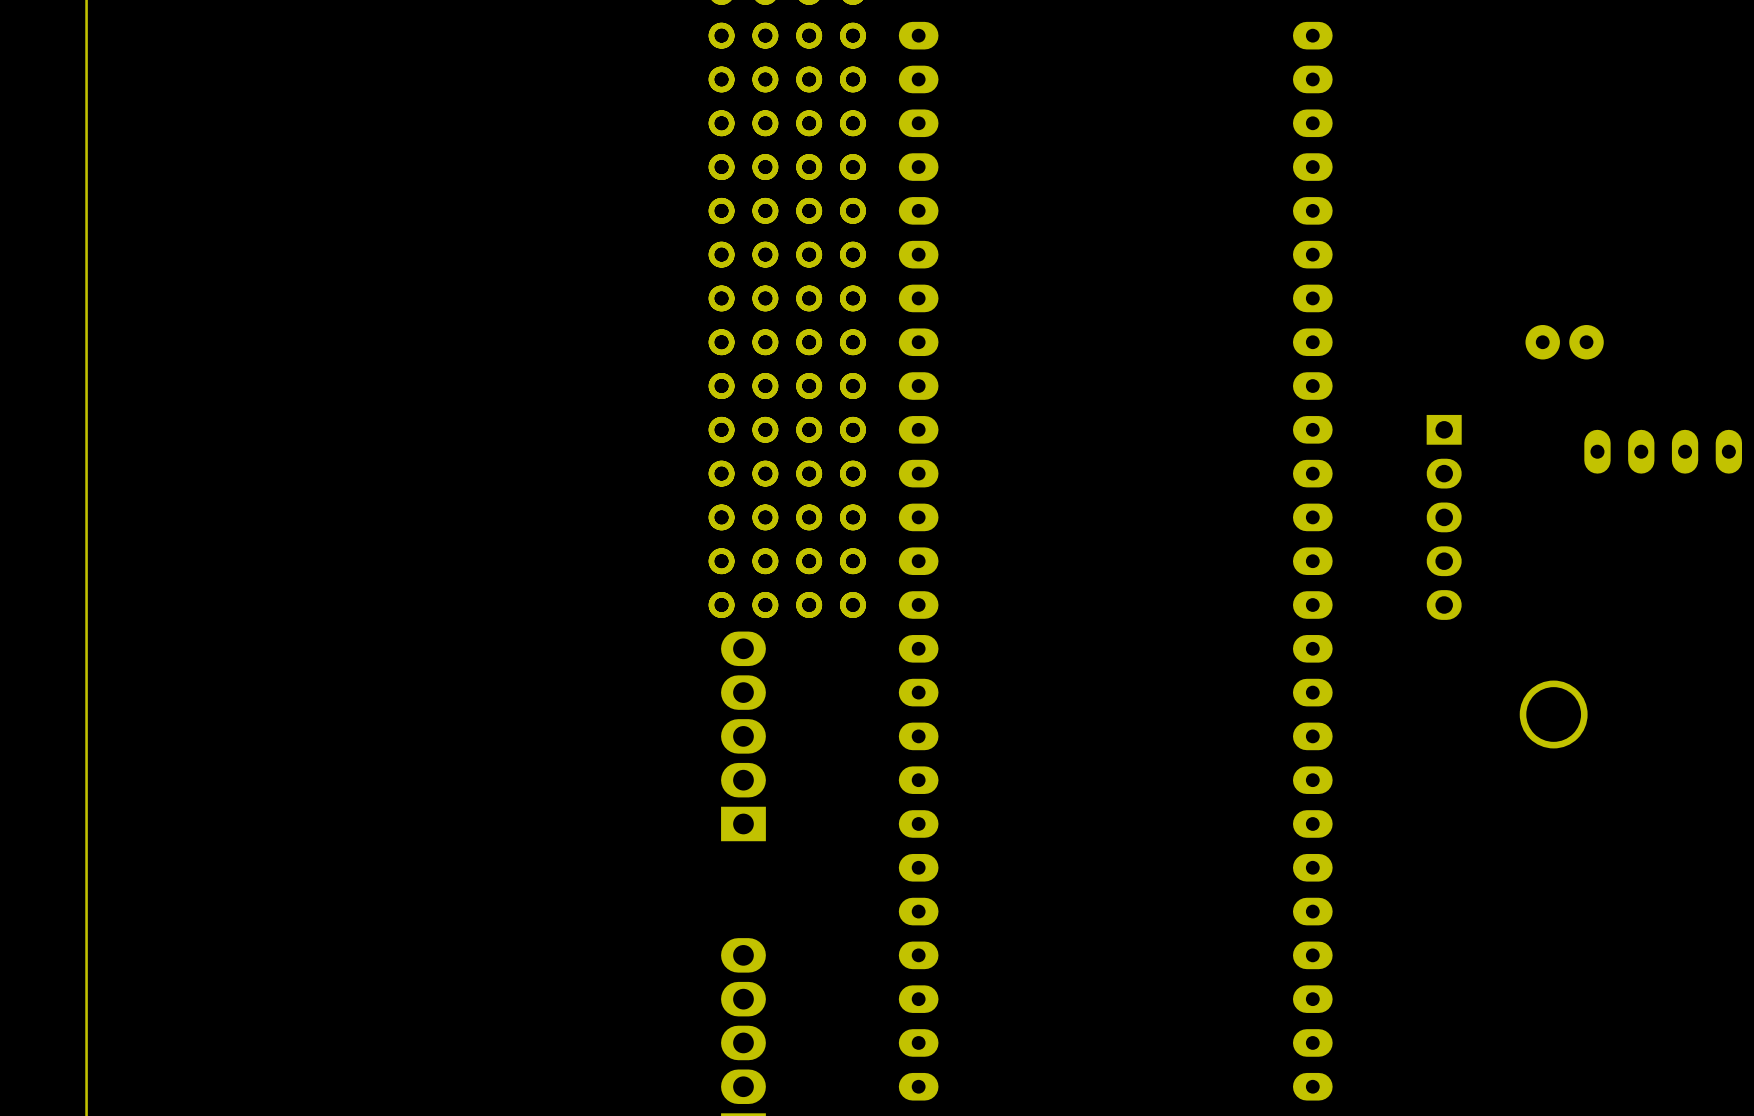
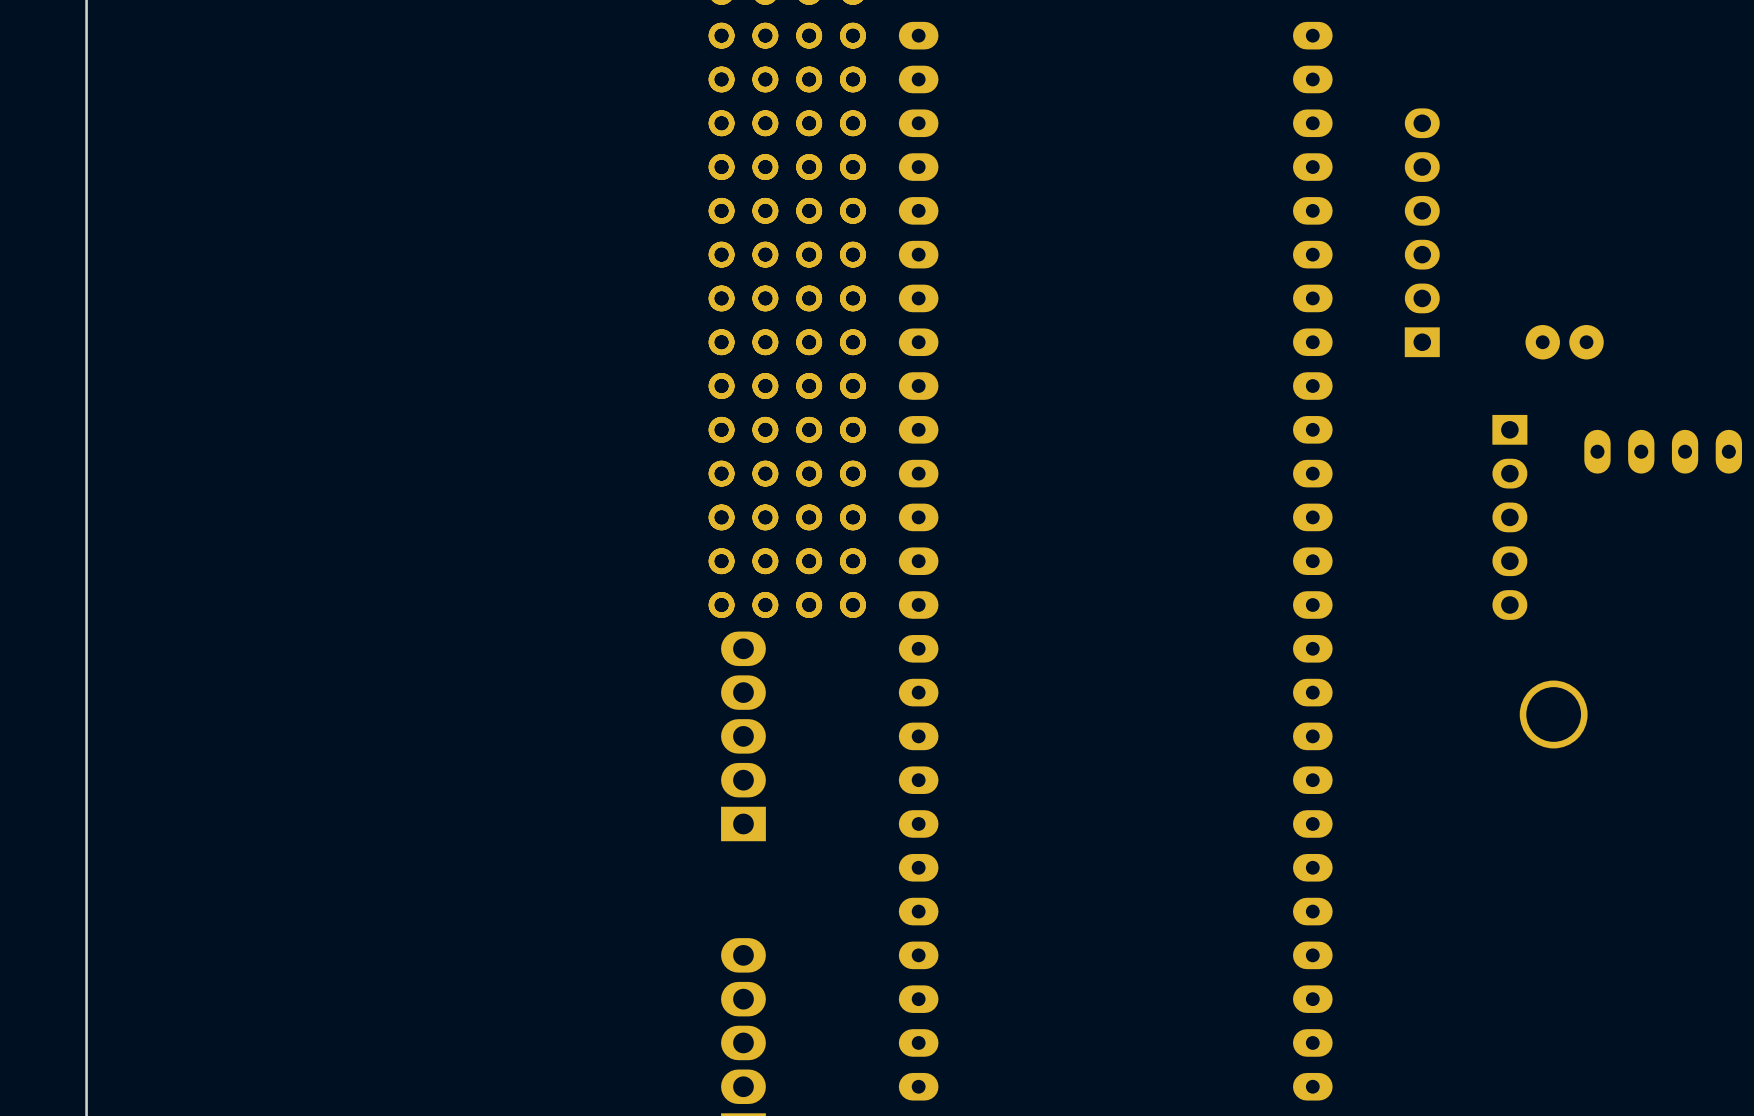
part: none -> (1422, 232)
part position: (1444, 517) -> (1509, 517)

